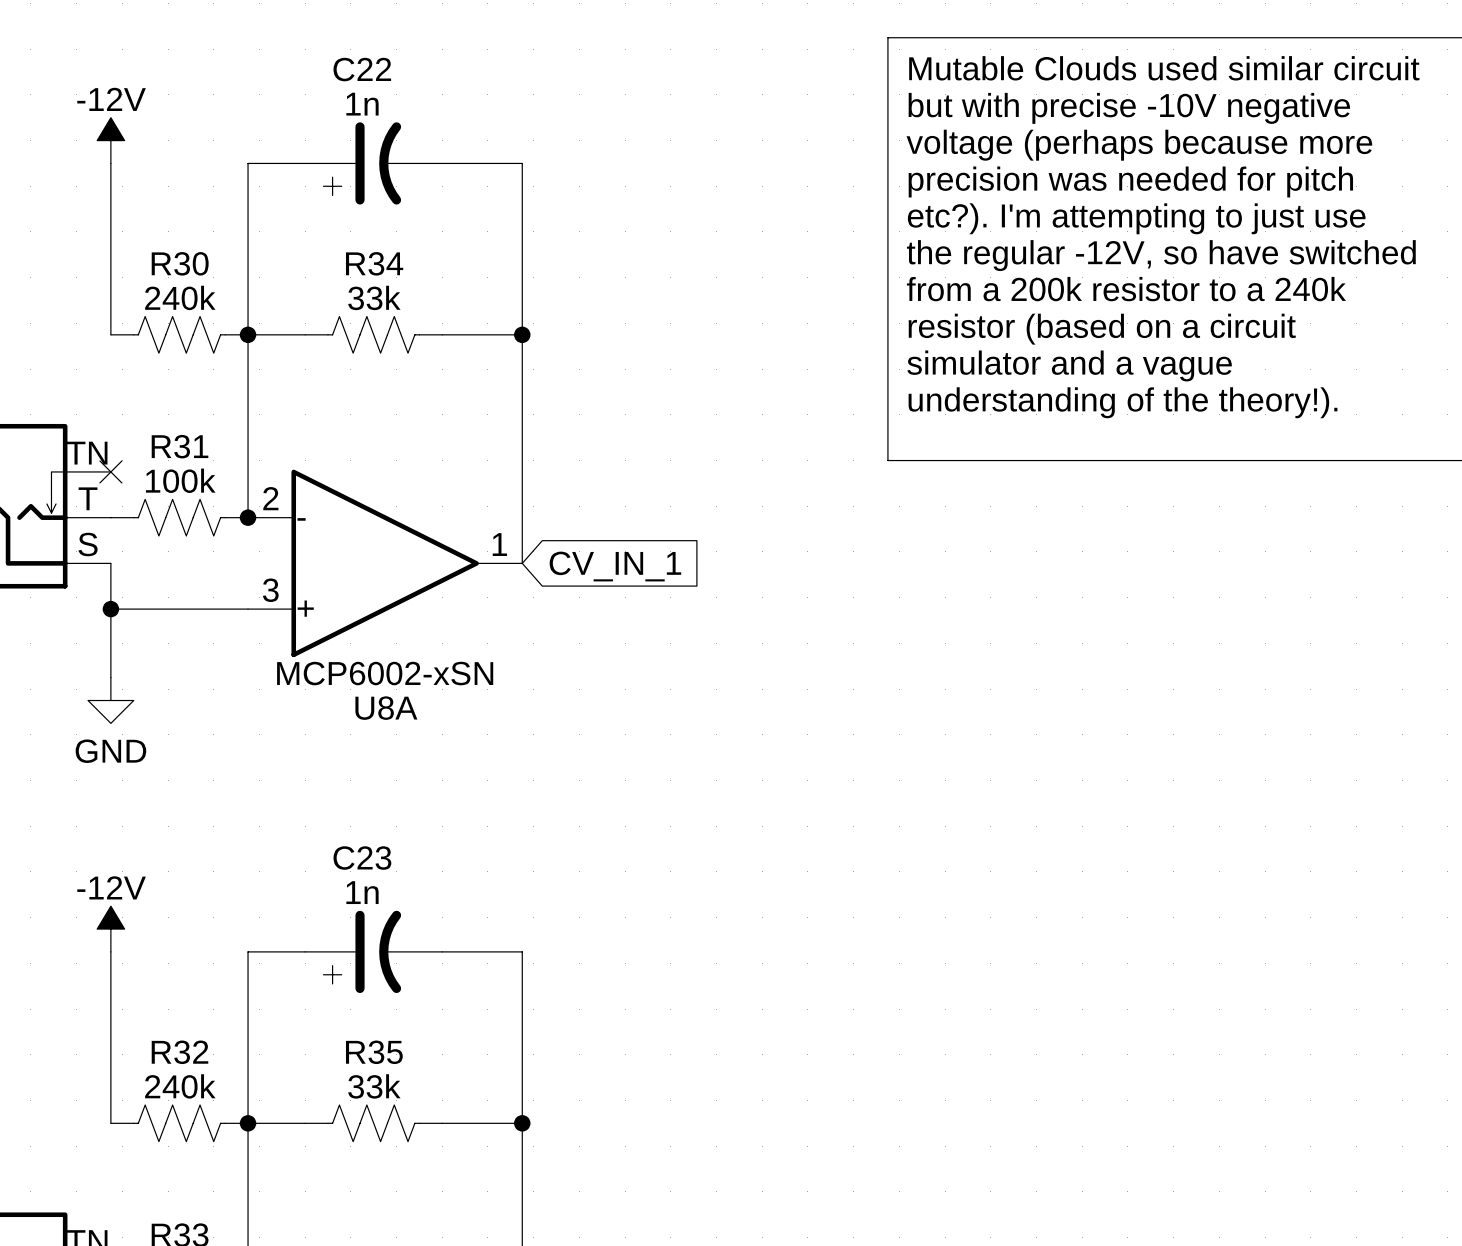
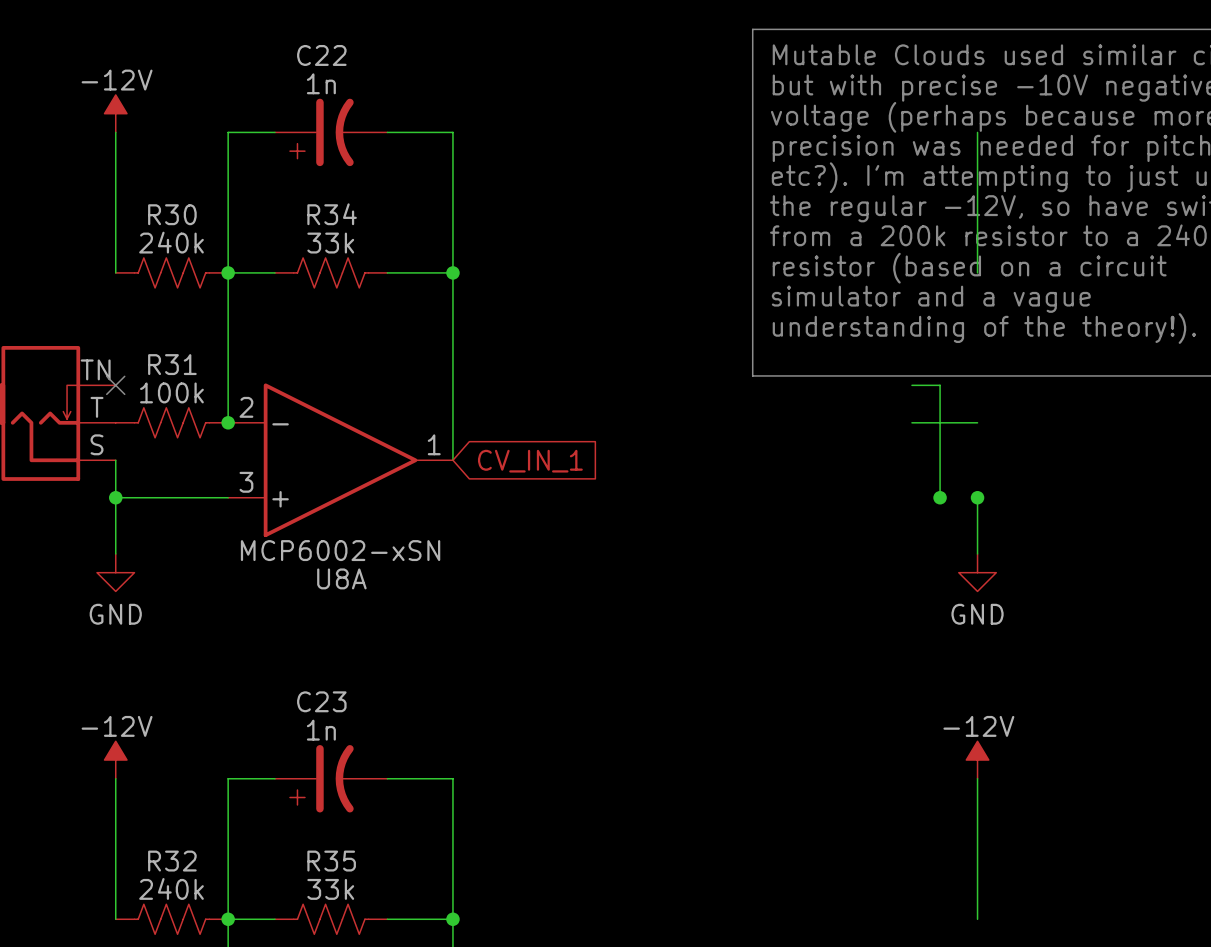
wire: none -> (977, 132) (977, 272)
wire: none -> (911, 385) (940, 385) (940, 497)
wire: none -> (911, 422) (977, 422)
junction: none -> (940, 497)
wire: none -> (977, 497) (977, 553)
junction: none -> (977, 497)
power symbol: none -> GND (977, 572)
power symbol: none -> -12V (977, 760)
wire: none -> (977, 778) (977, 919)

